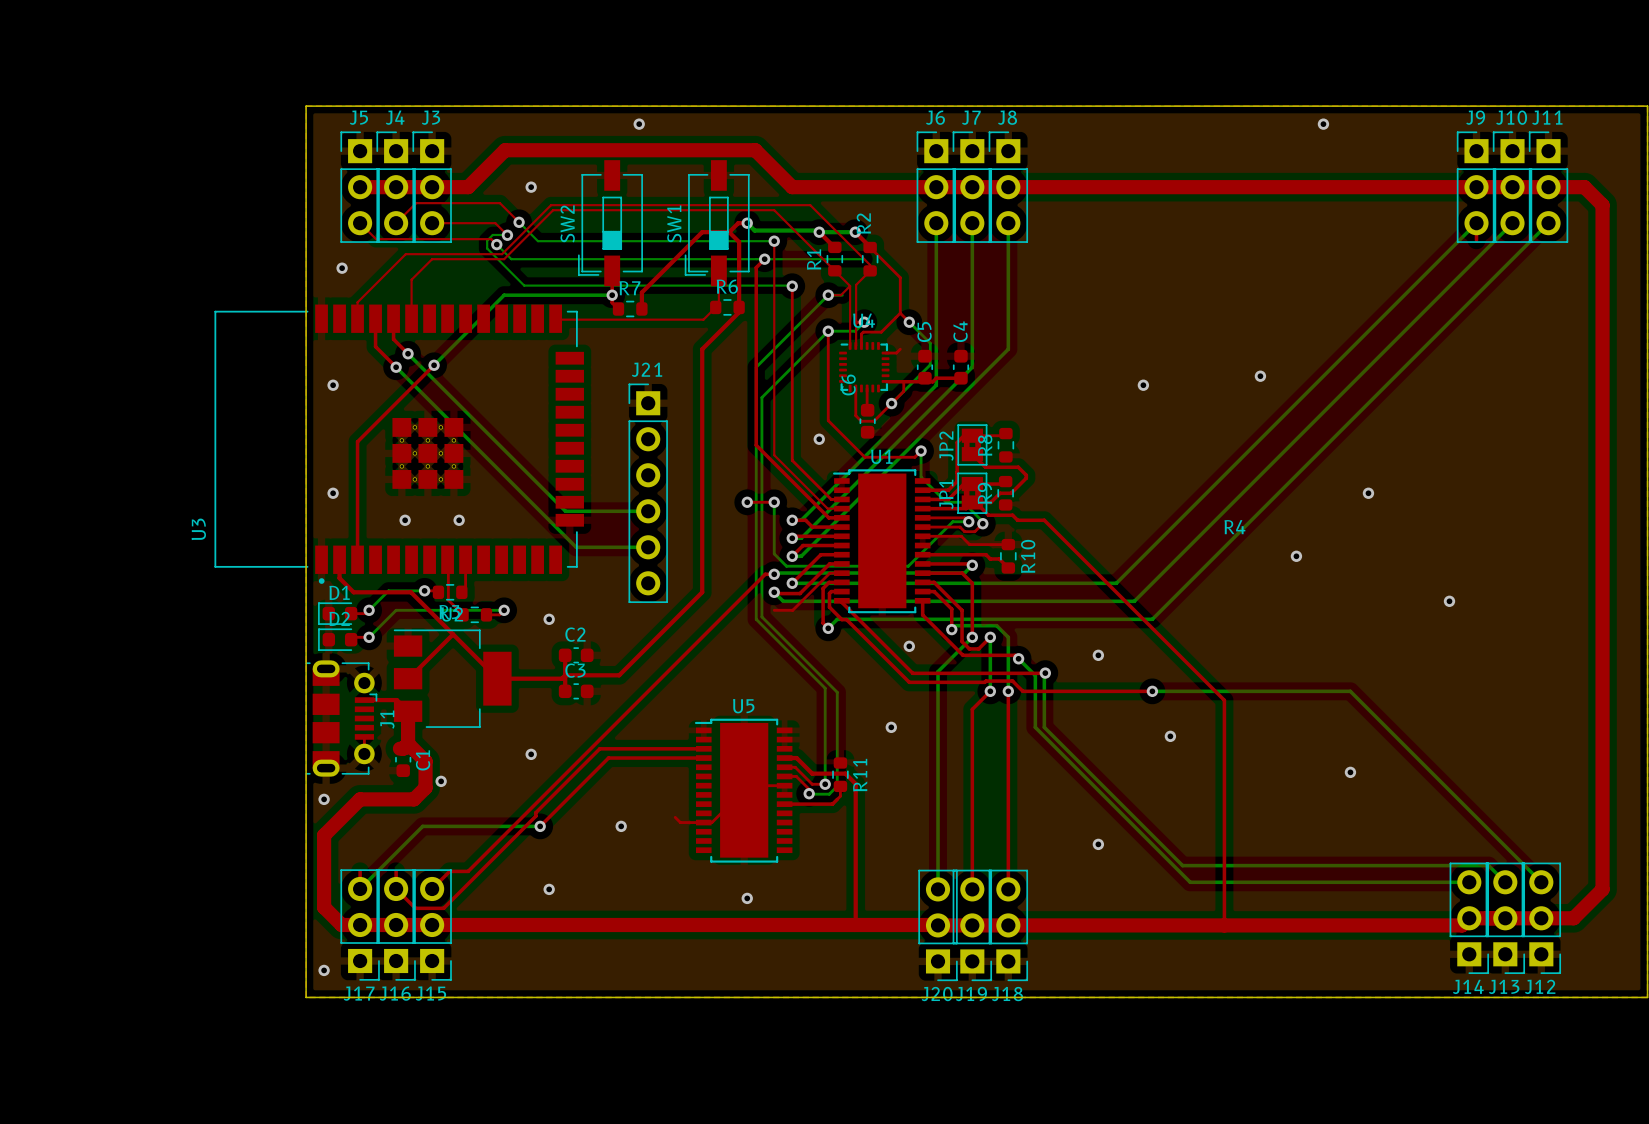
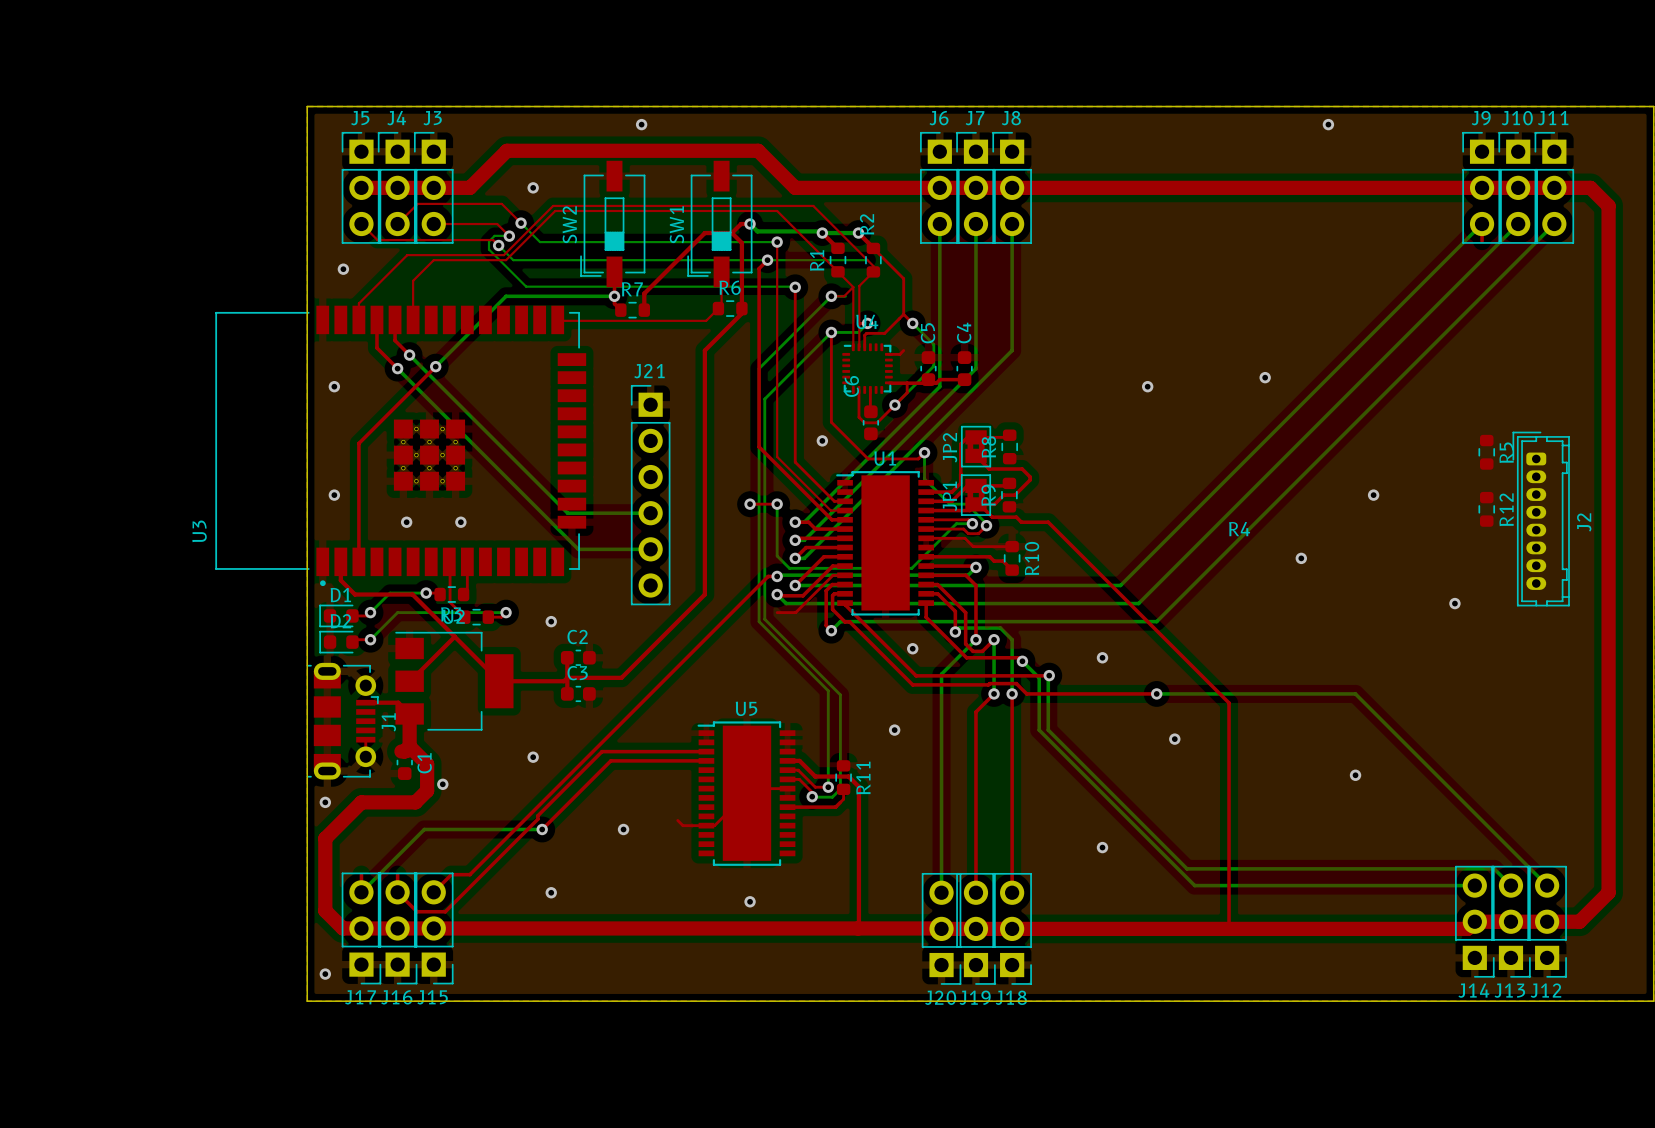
R5: none -> (1486, 452)
R12: none -> (1486, 509)
J2: none -> (1541, 519)

